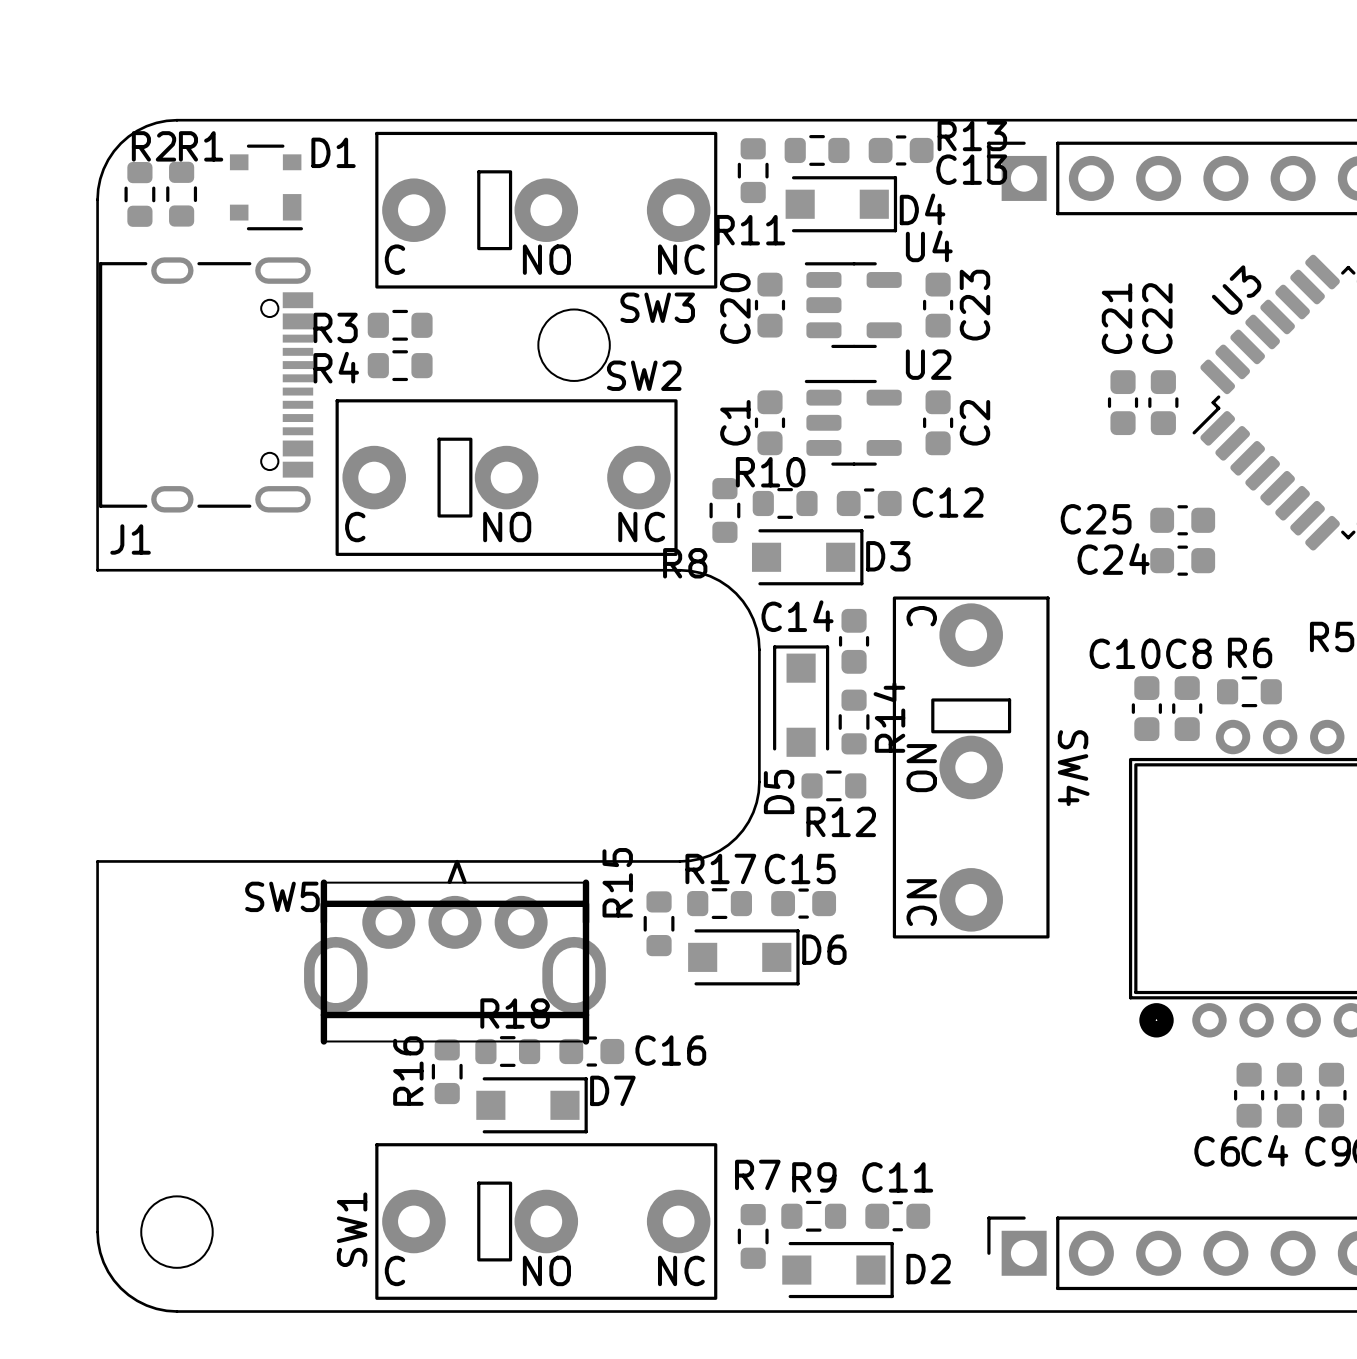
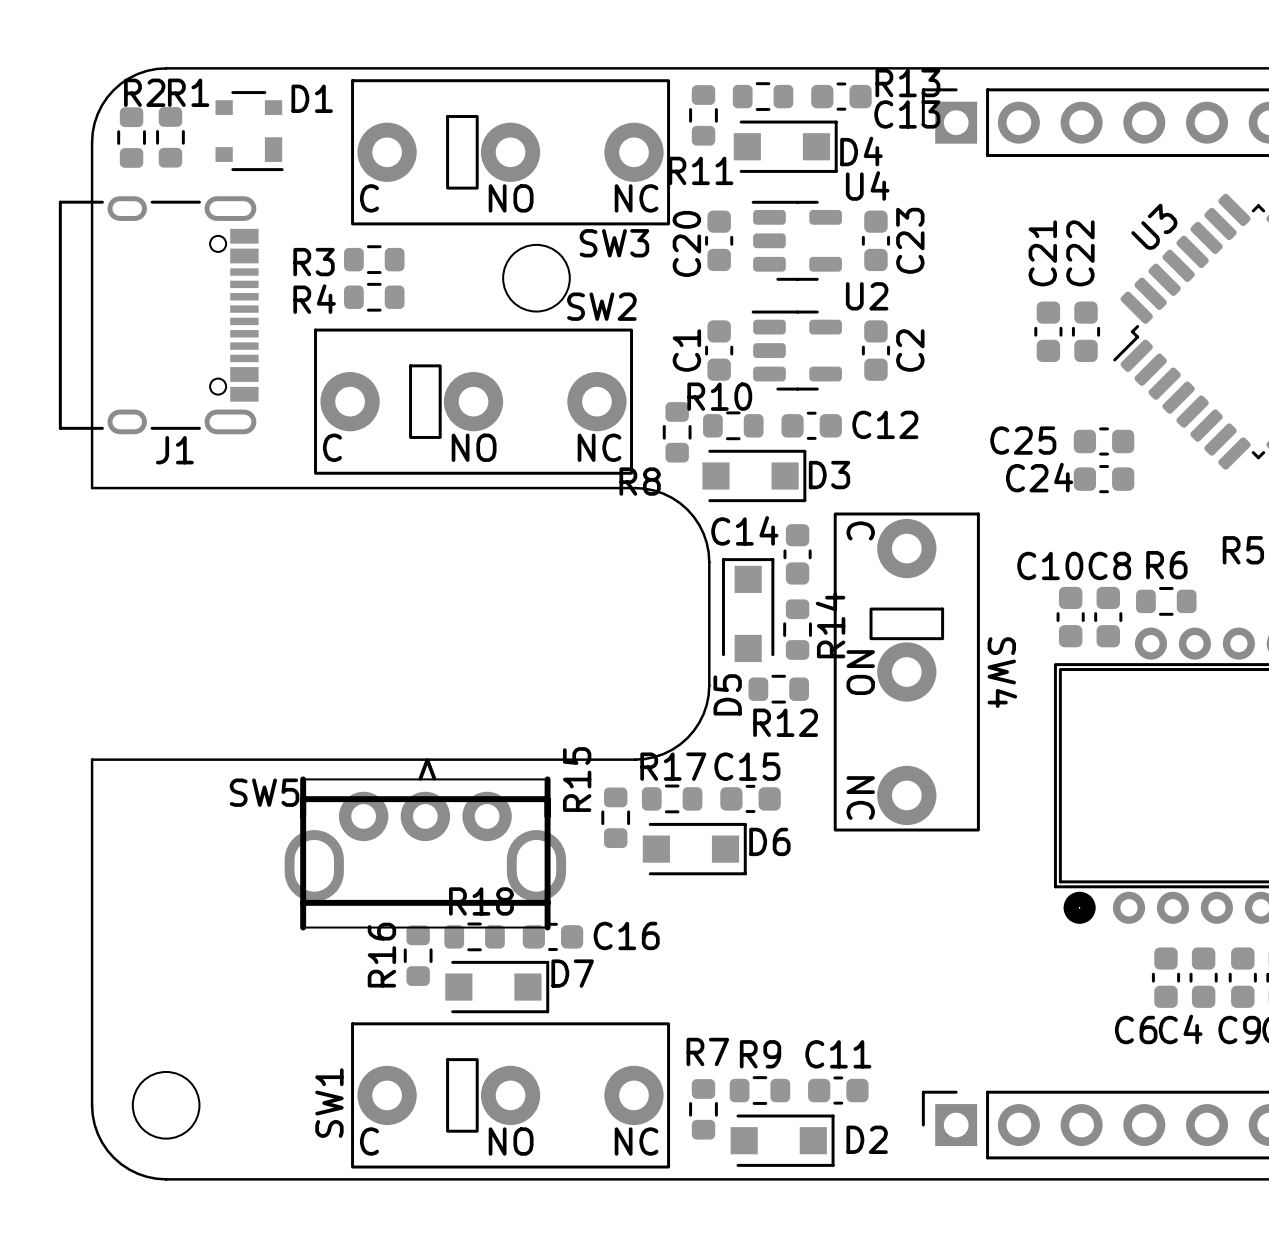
J1 position: (206, 384) -> (158, 315)
J1 name position: J1 (130, 539) -> J1 (174, 450)

